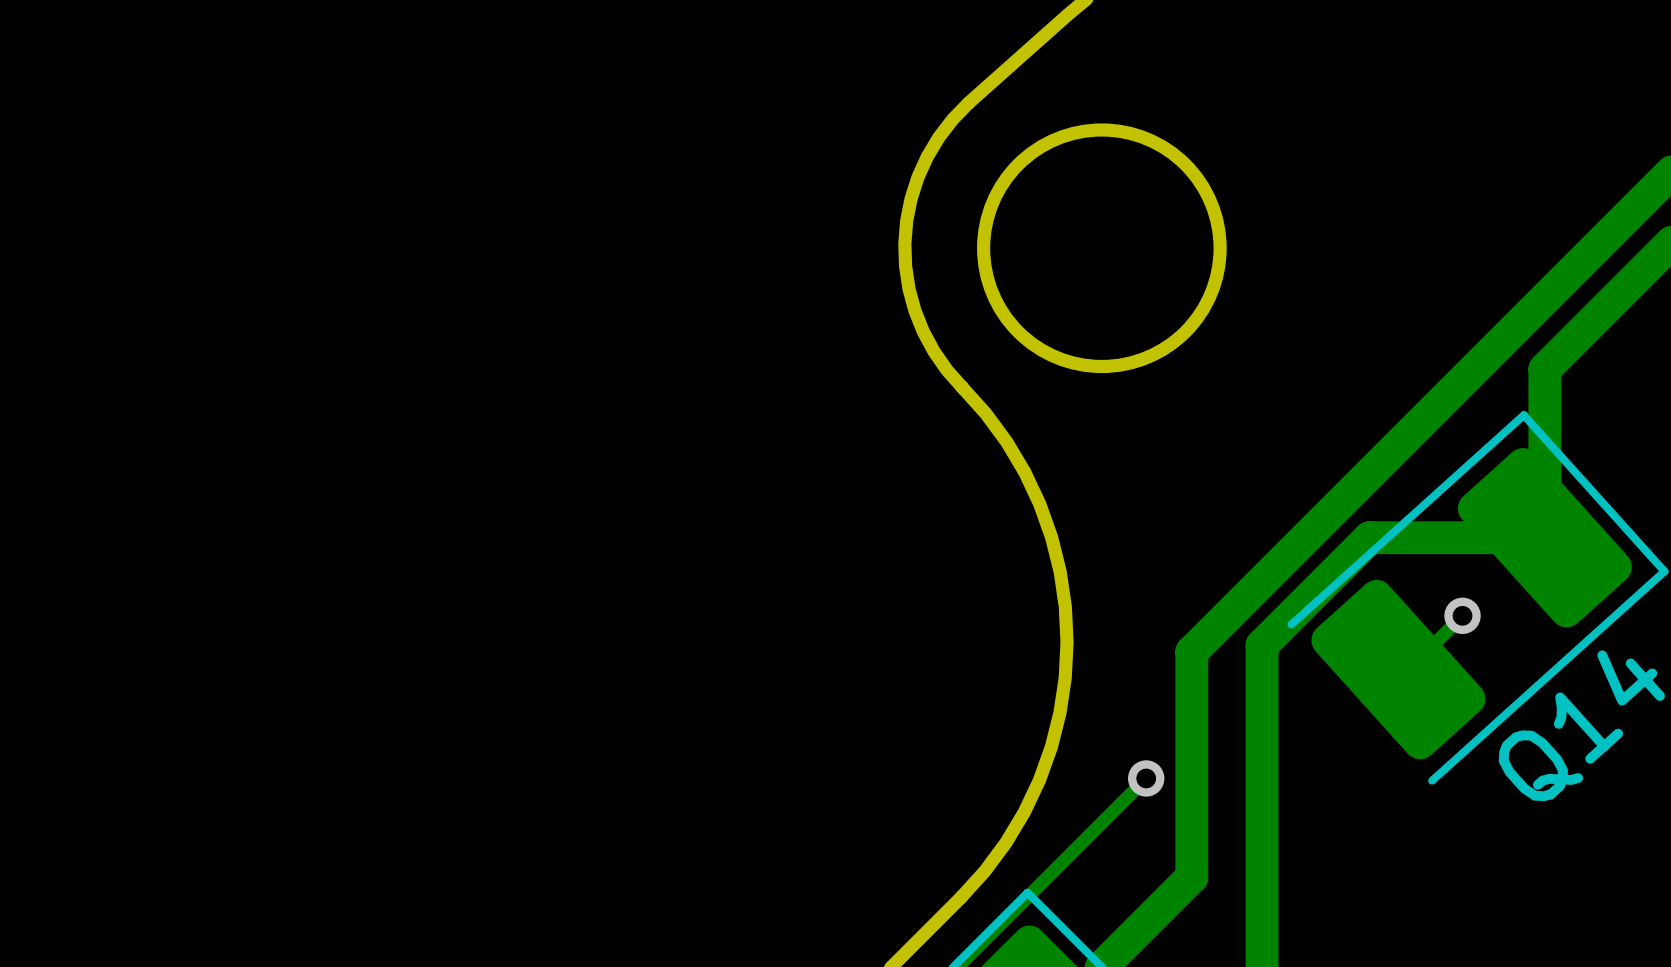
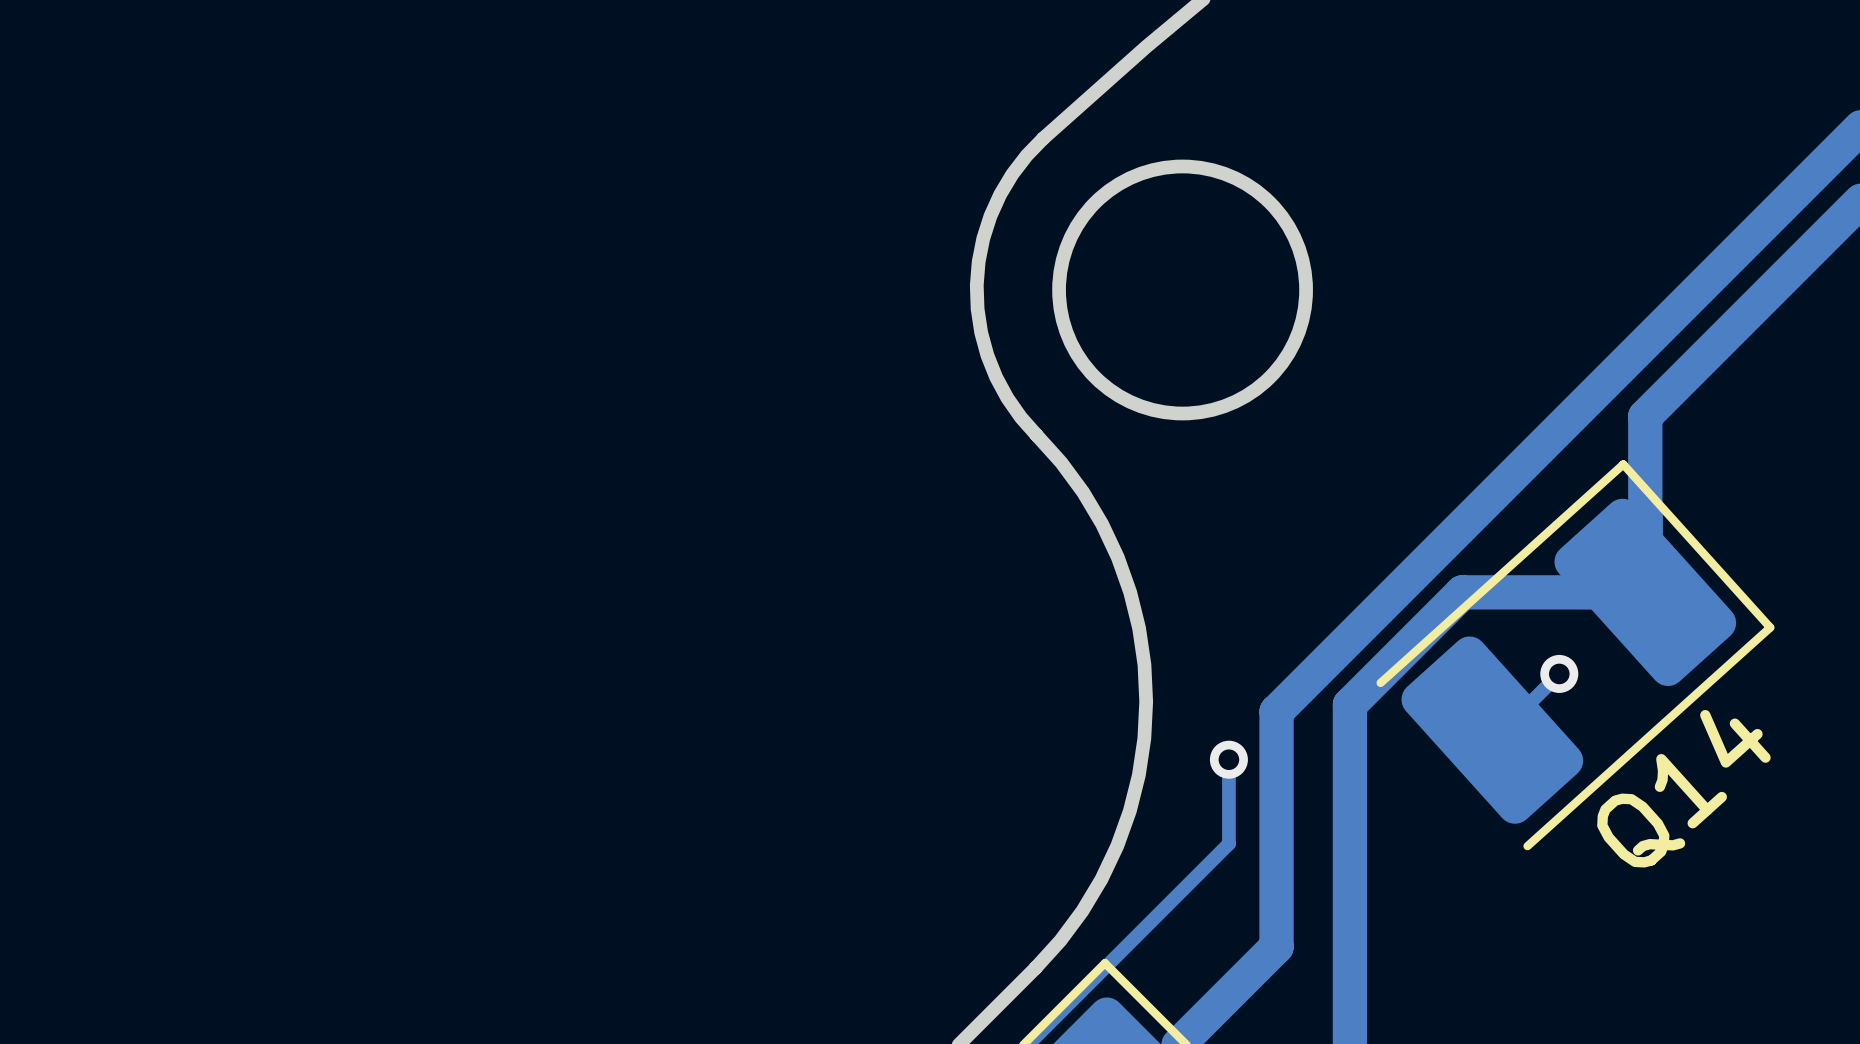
track: none -> (1228, 759) (1228, 843)
via position: (1146, 778) -> (1228, 759)

